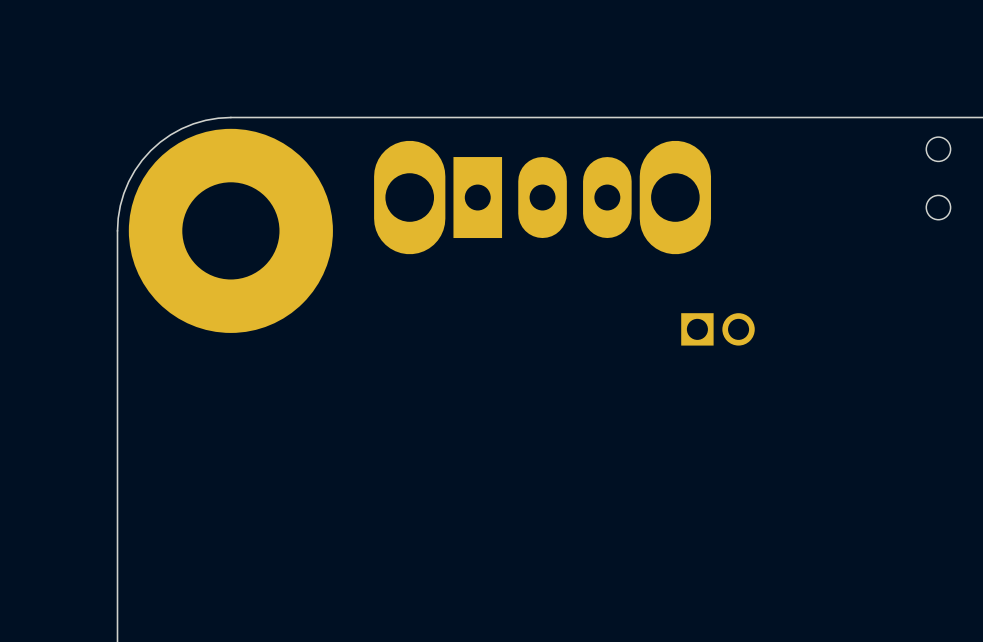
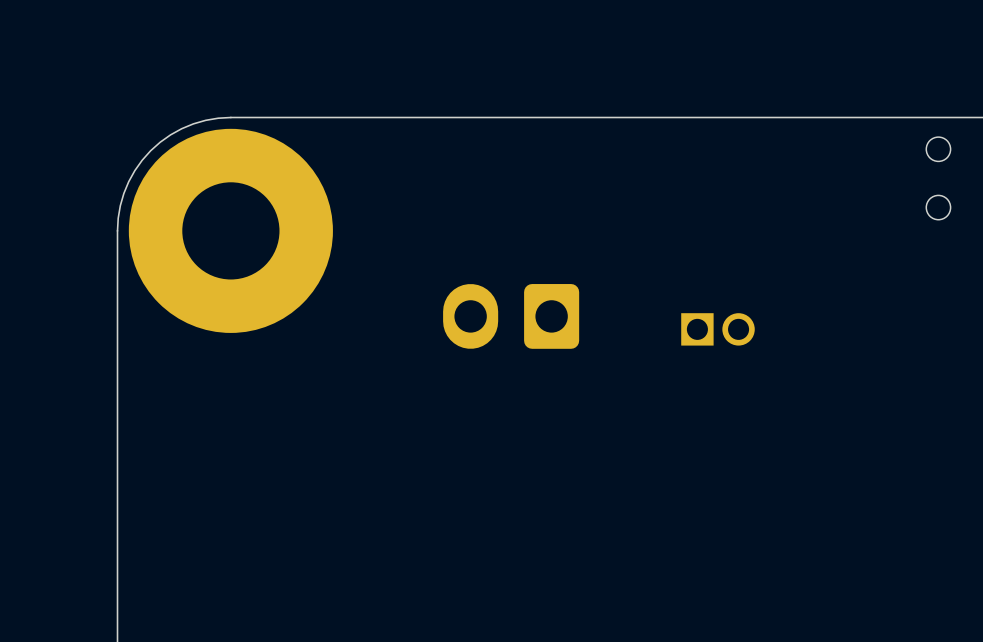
part: (542, 197) -> none
part: none -> (511, 316)

